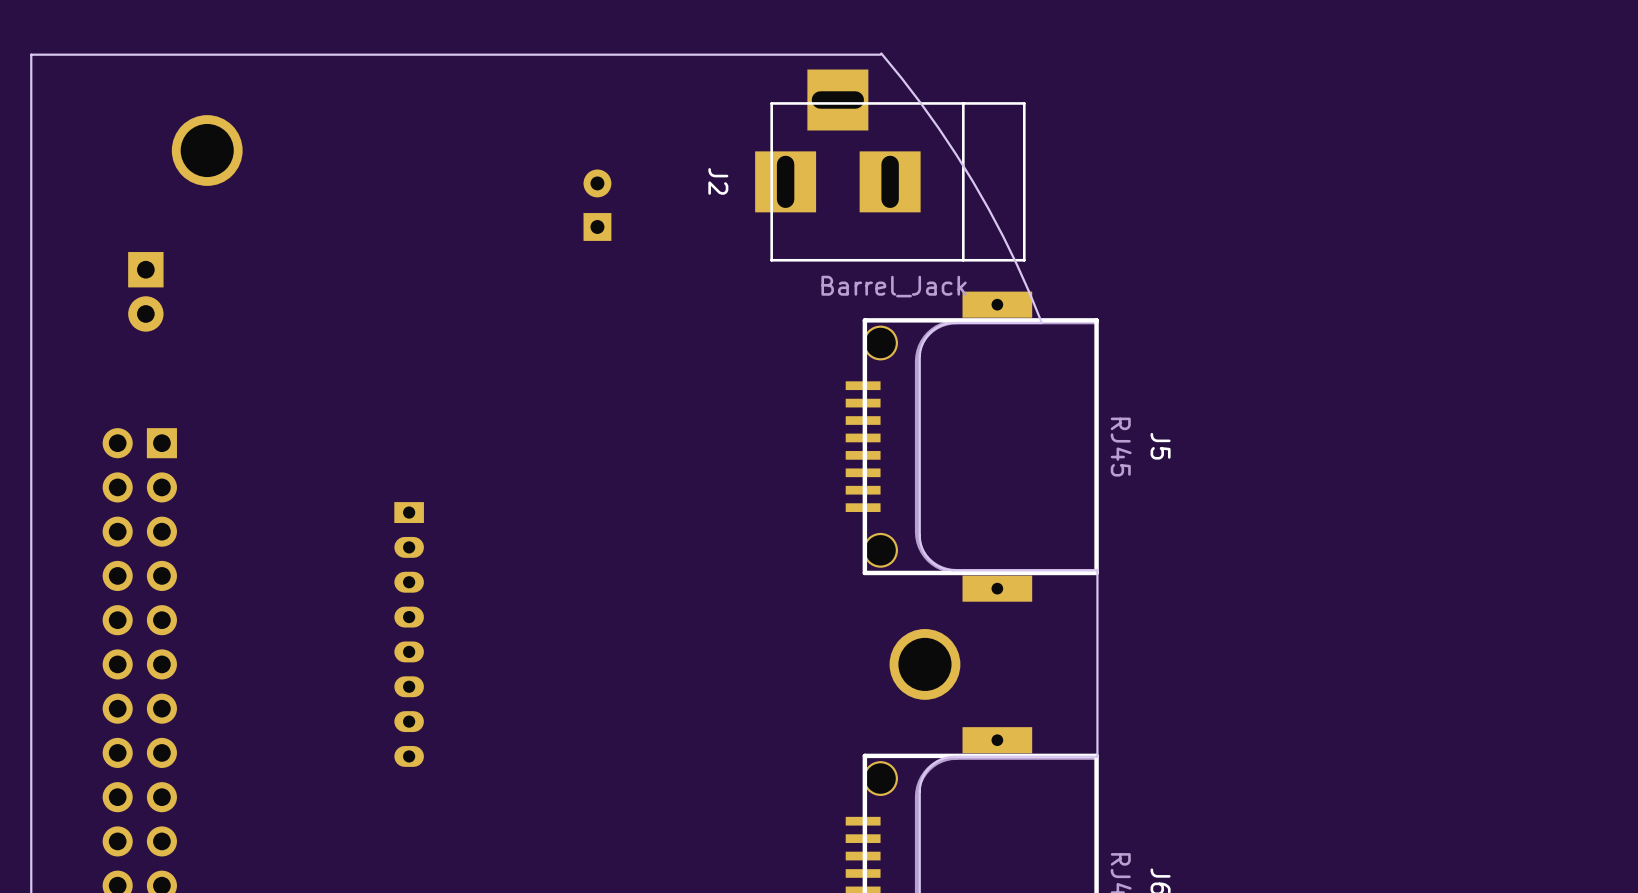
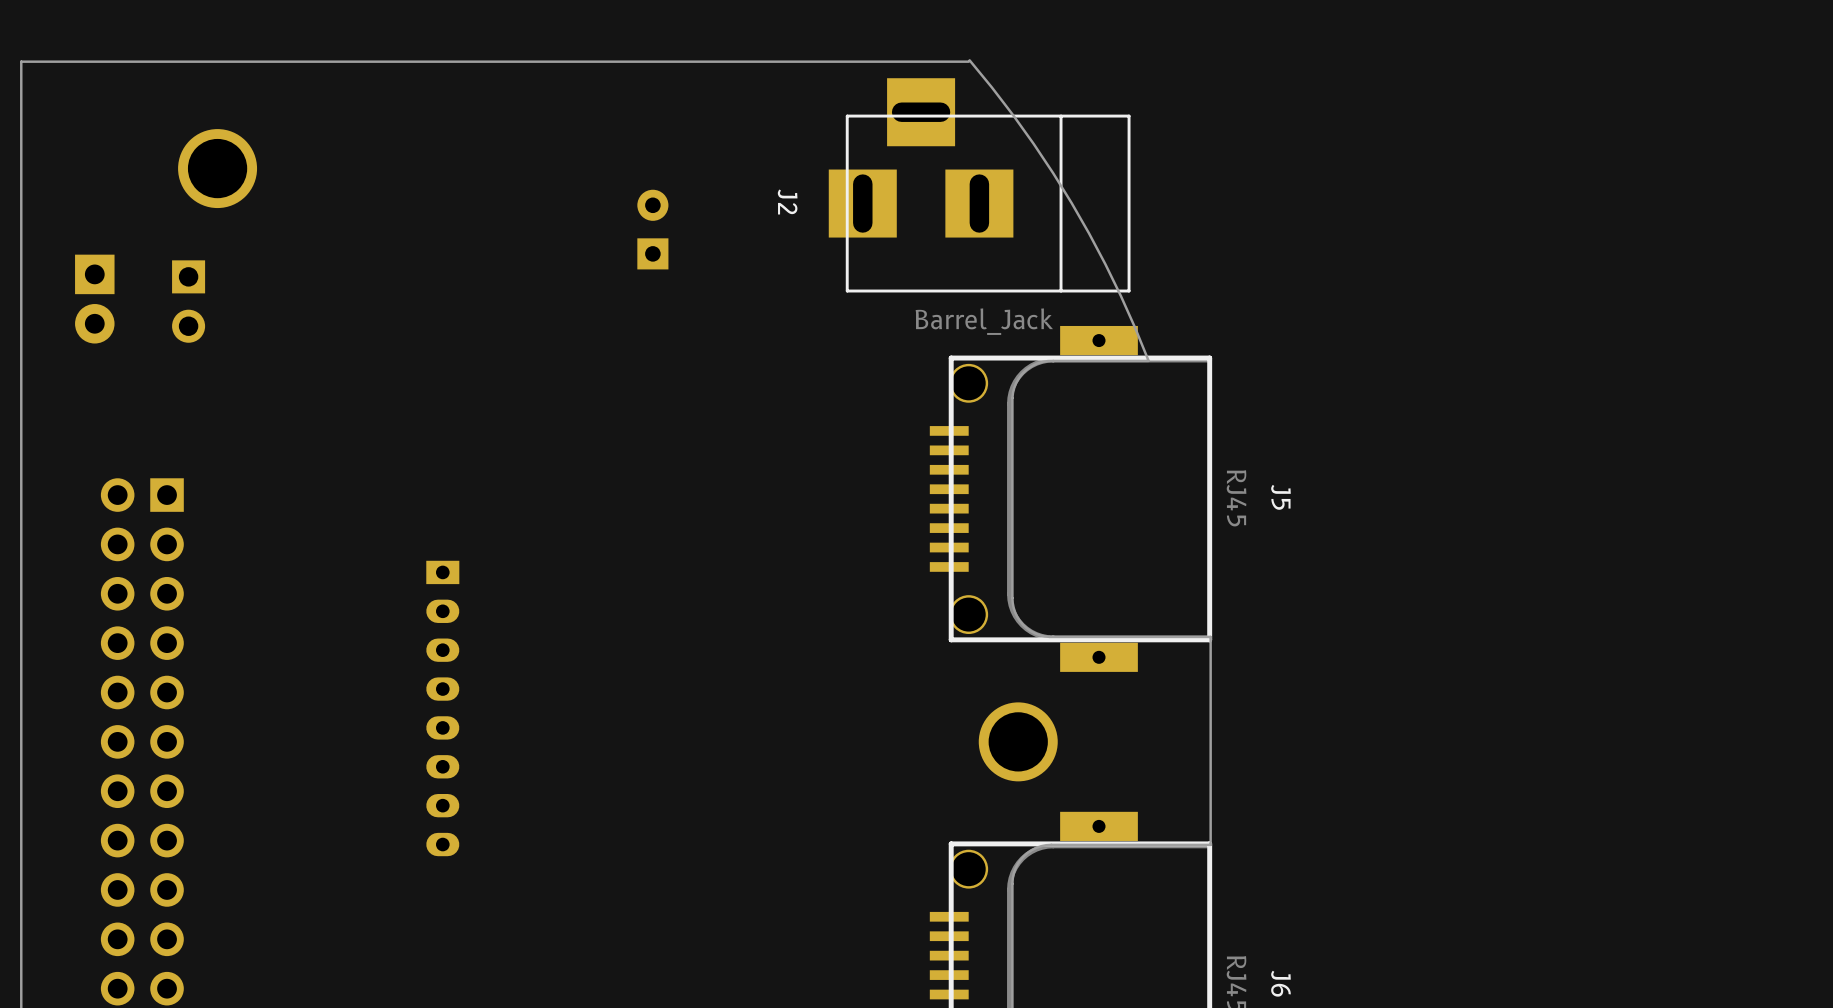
part: none -> (188, 301)
part position: (145, 291) -> (94, 299)

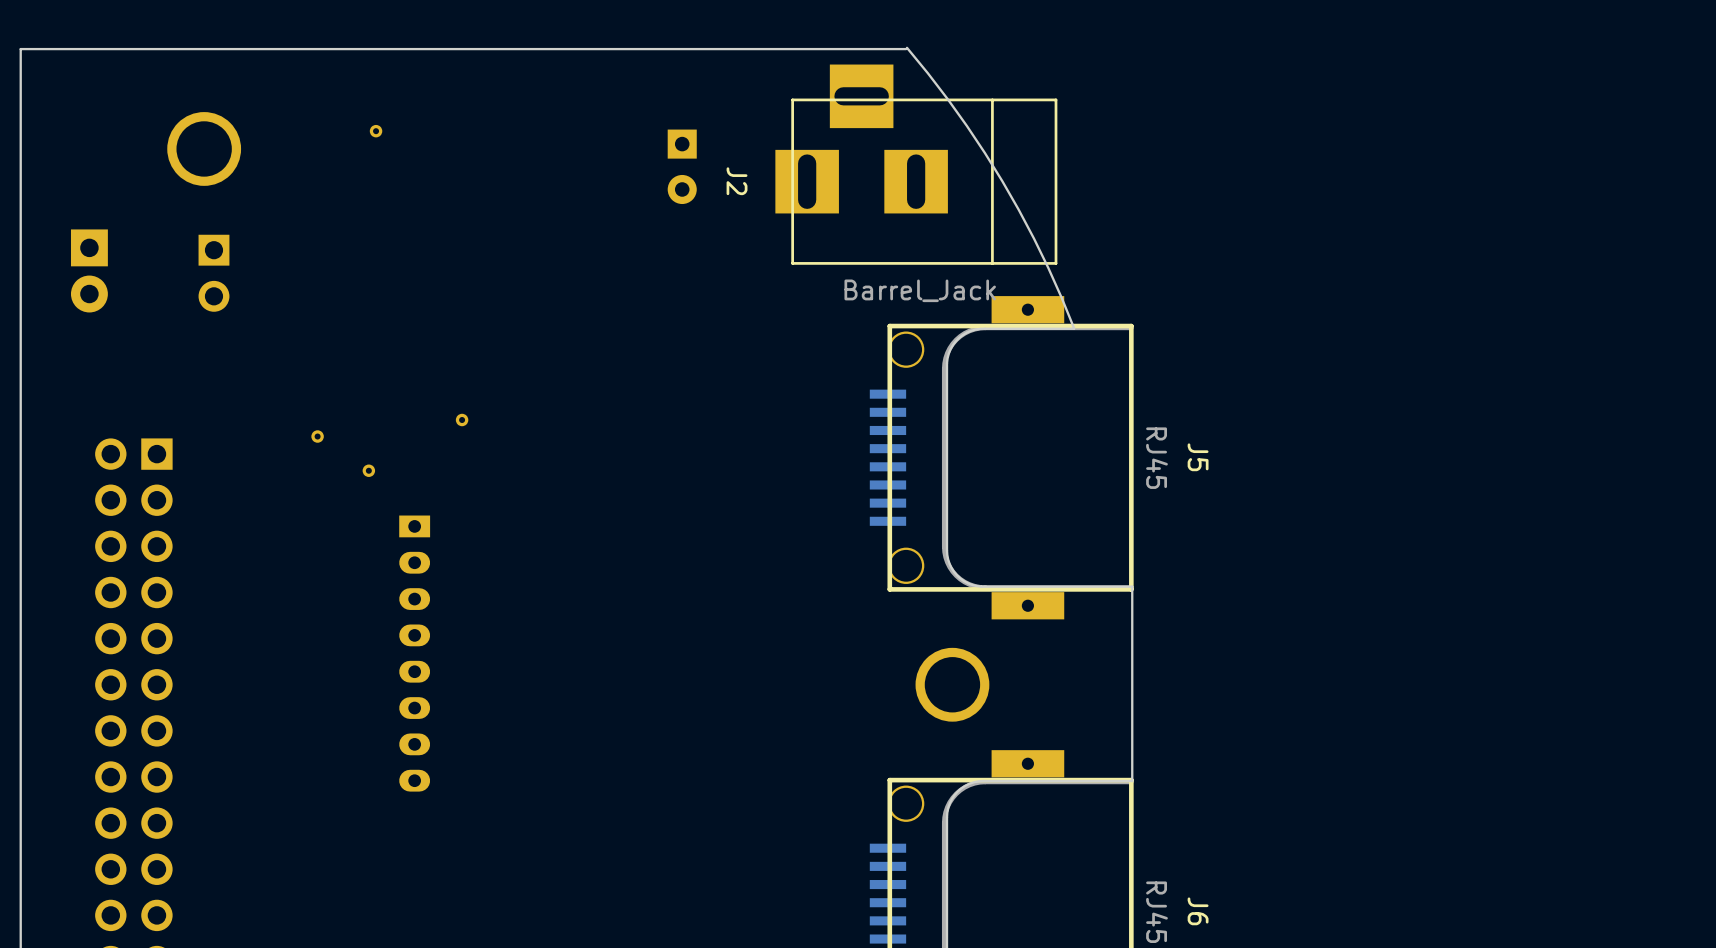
part: none -> (376, 131)
part rotation: 0° (652, 229) -> 180° (682, 166)
part position: (652, 229) -> (682, 166)
part position: (188, 301) -> (213, 273)
part: none -> (462, 420)
part: none -> (317, 436)
part: none -> (368, 470)

